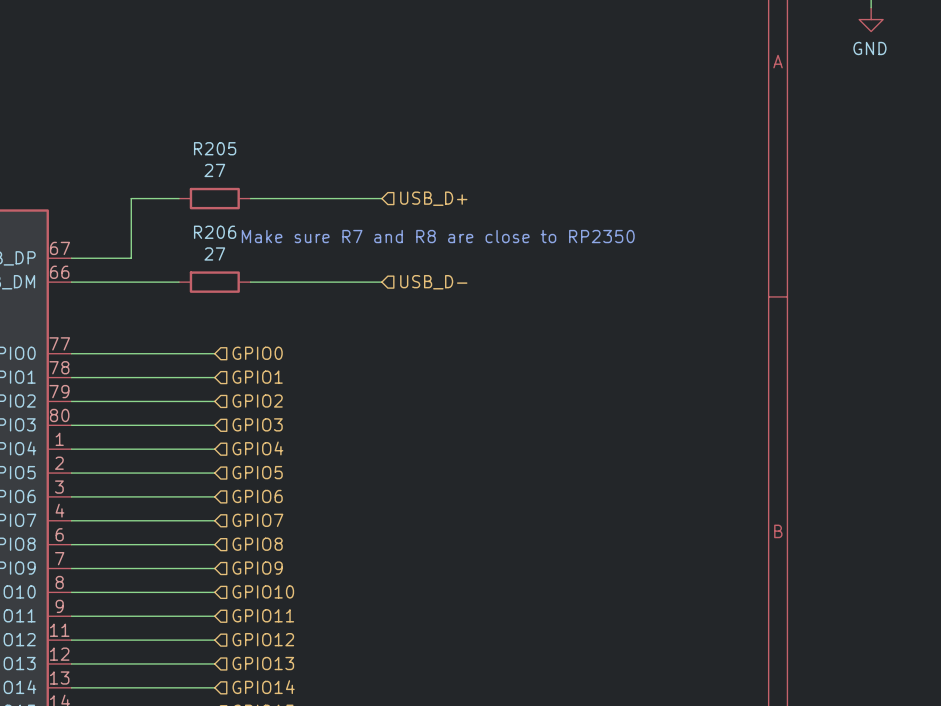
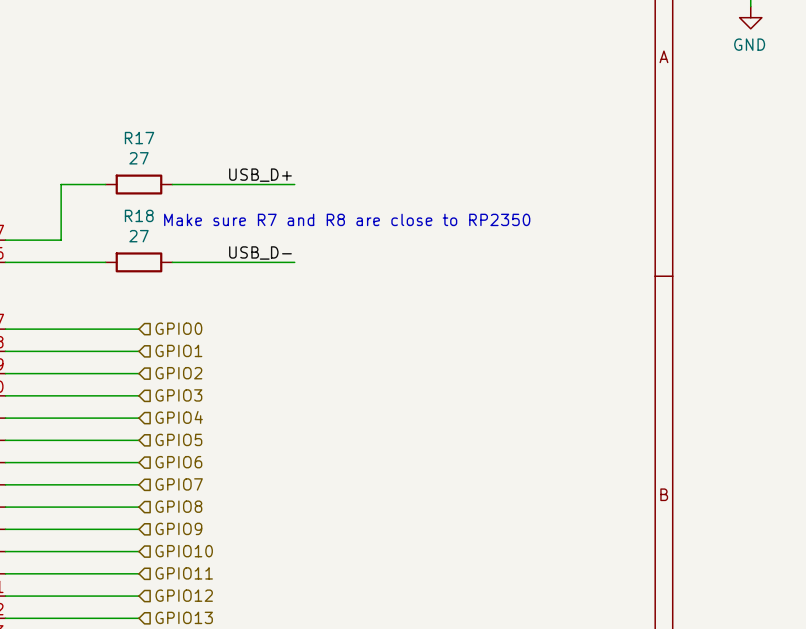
R205 name: R205 (215, 148) -> R17 (139, 138)
label: none -> USB_D+ (260, 175)
hierarchical label: USB_D+ (433, 198) -> none
R206 name: R206 (215, 232) -> R18 (139, 215)
label: none -> USB_D- (260, 252)
hierarchical label: USB_D- (433, 282) -> none

